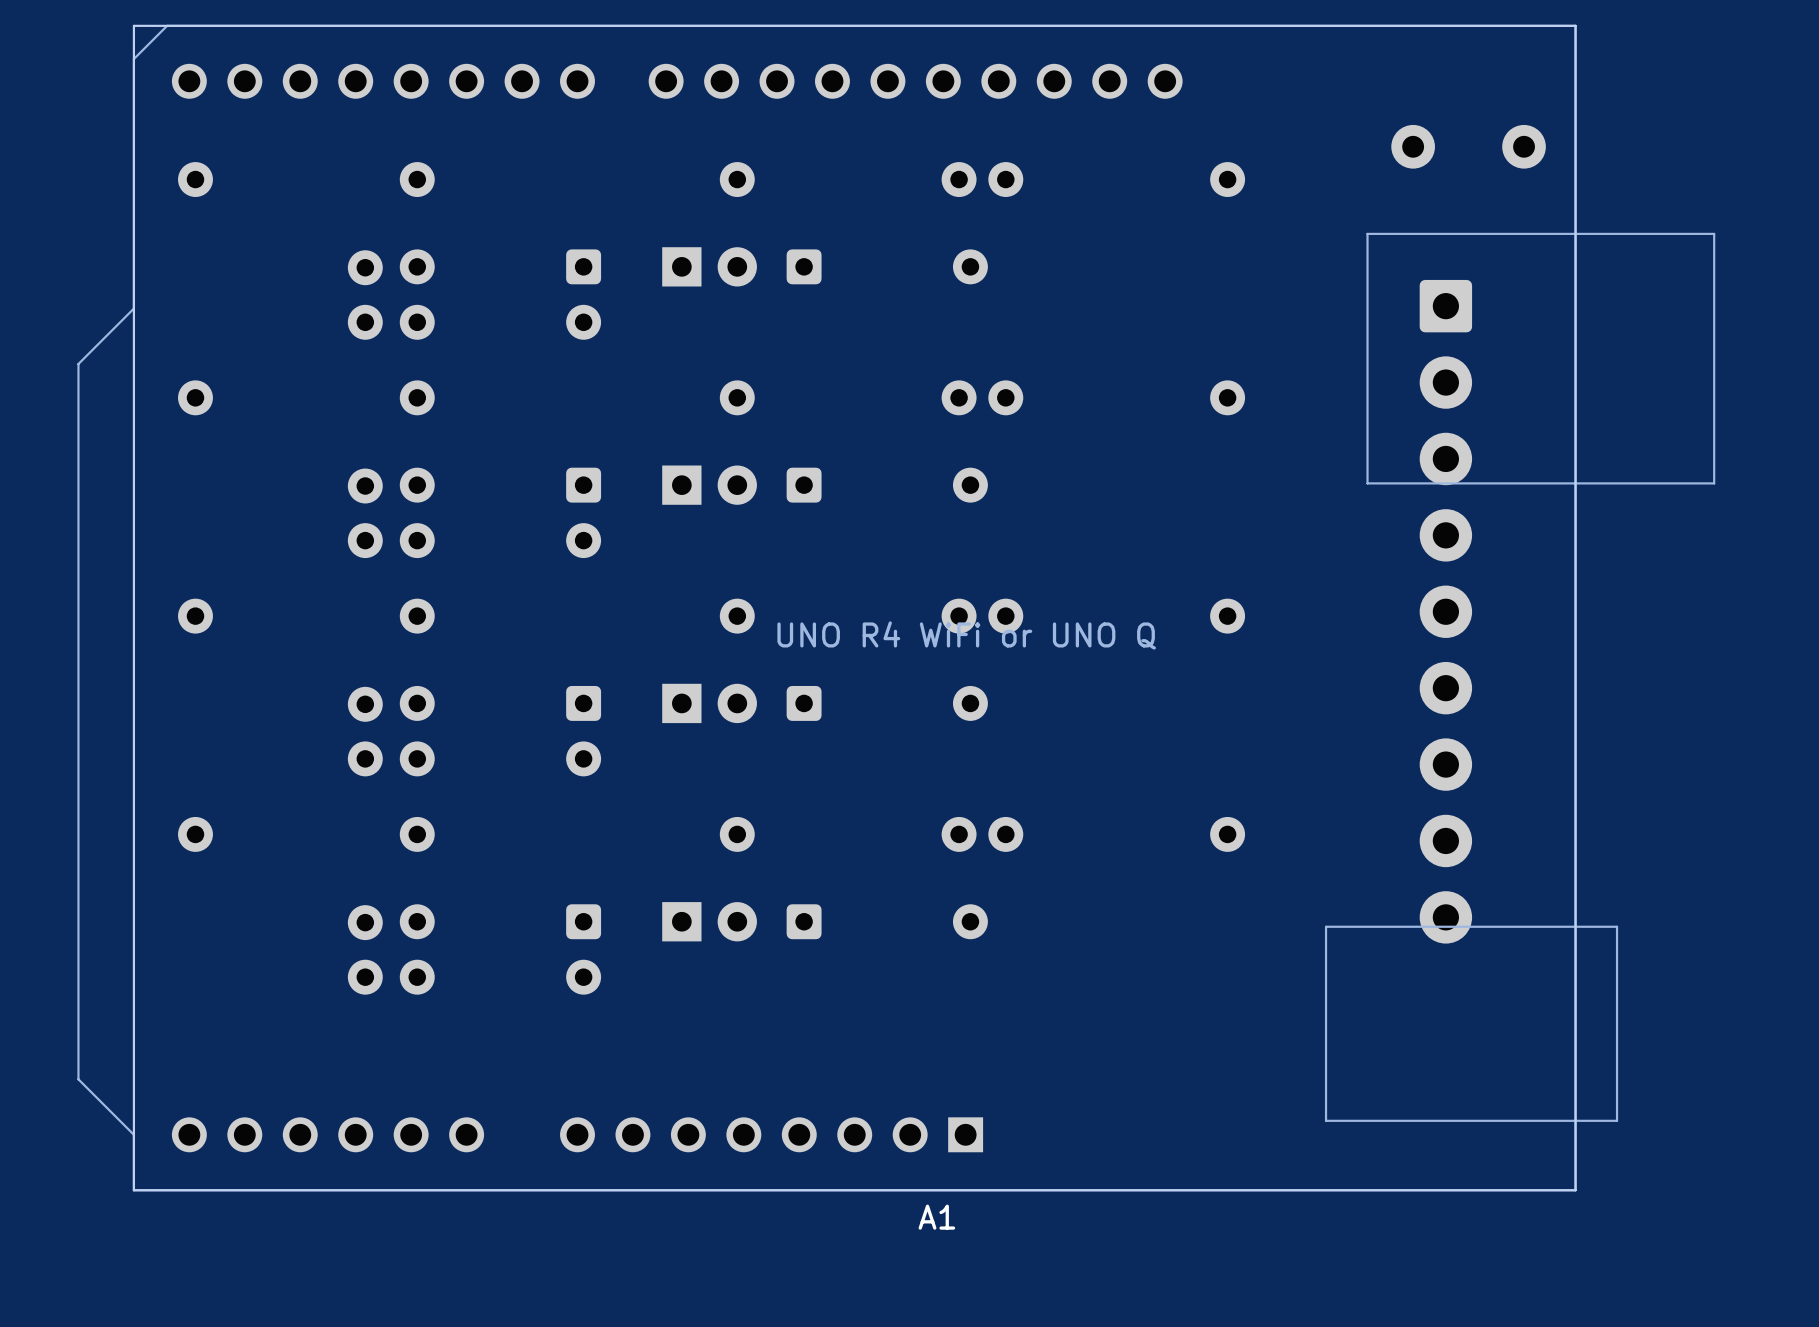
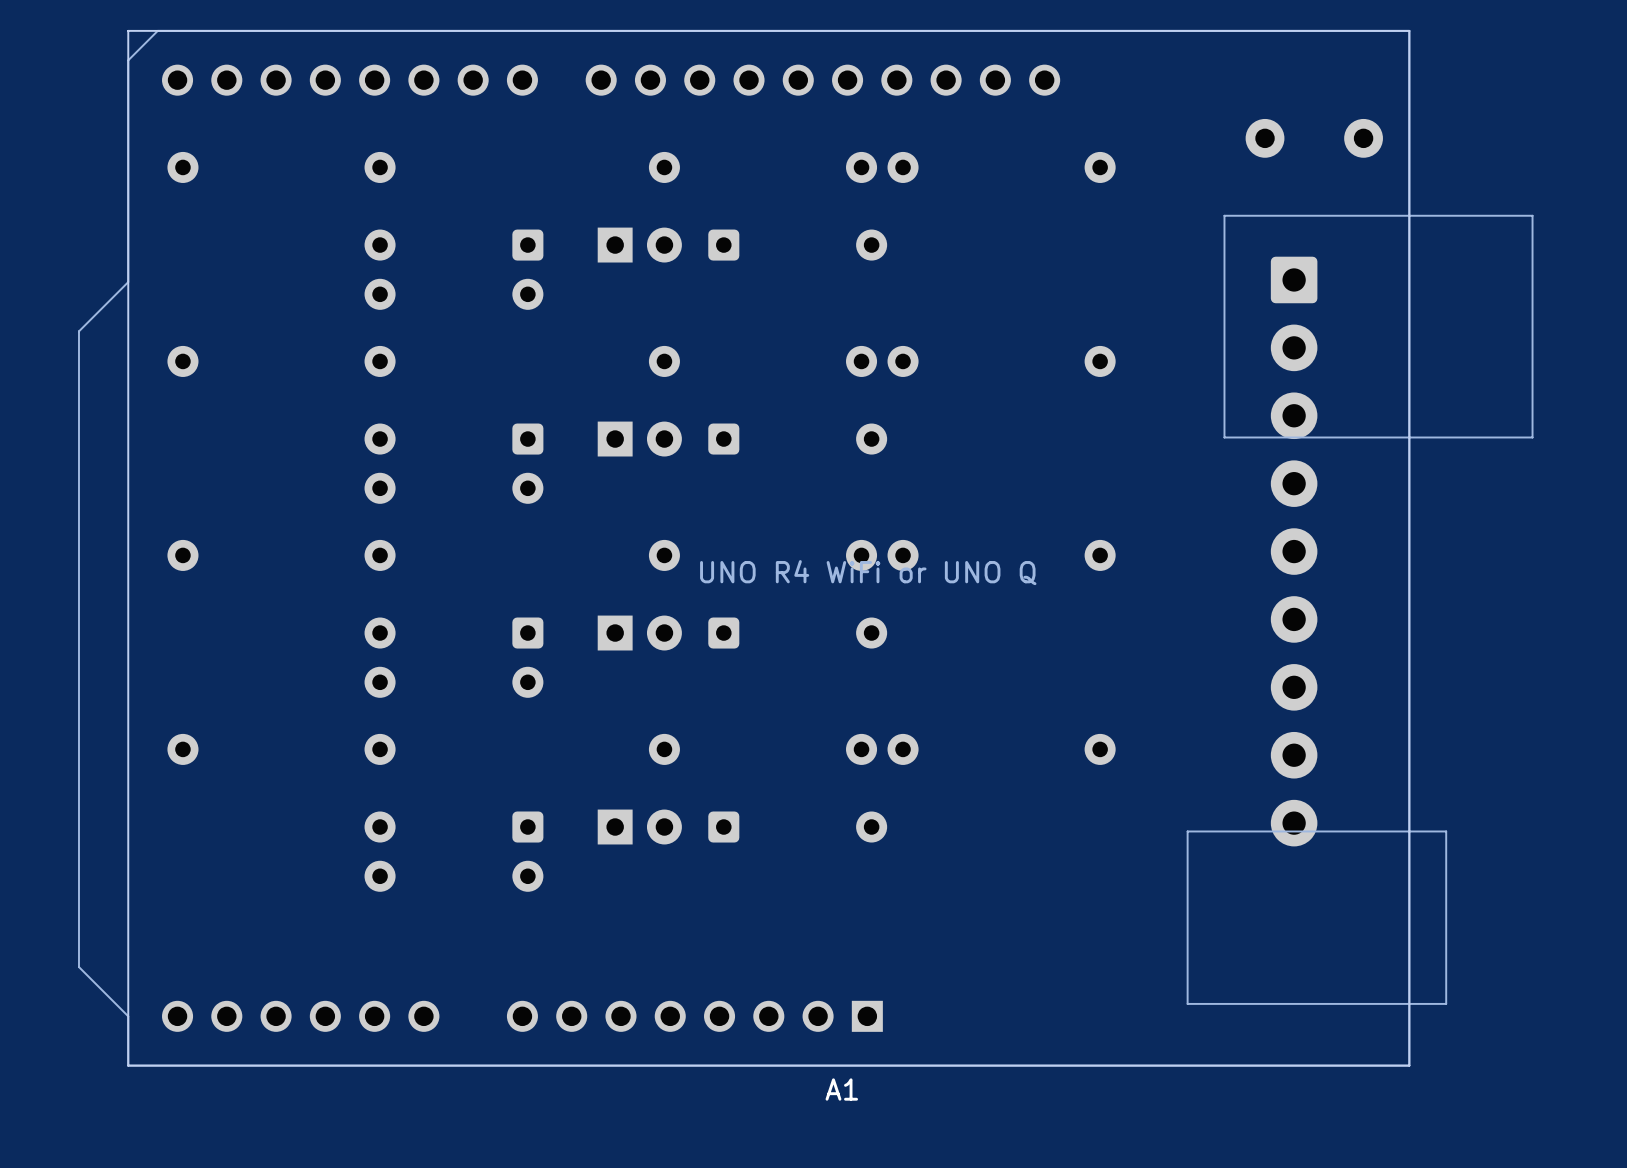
part: (365, 295) -> none
part: (365, 513) -> none
part: (365, 731) -> none
part: (365, 949) -> none

